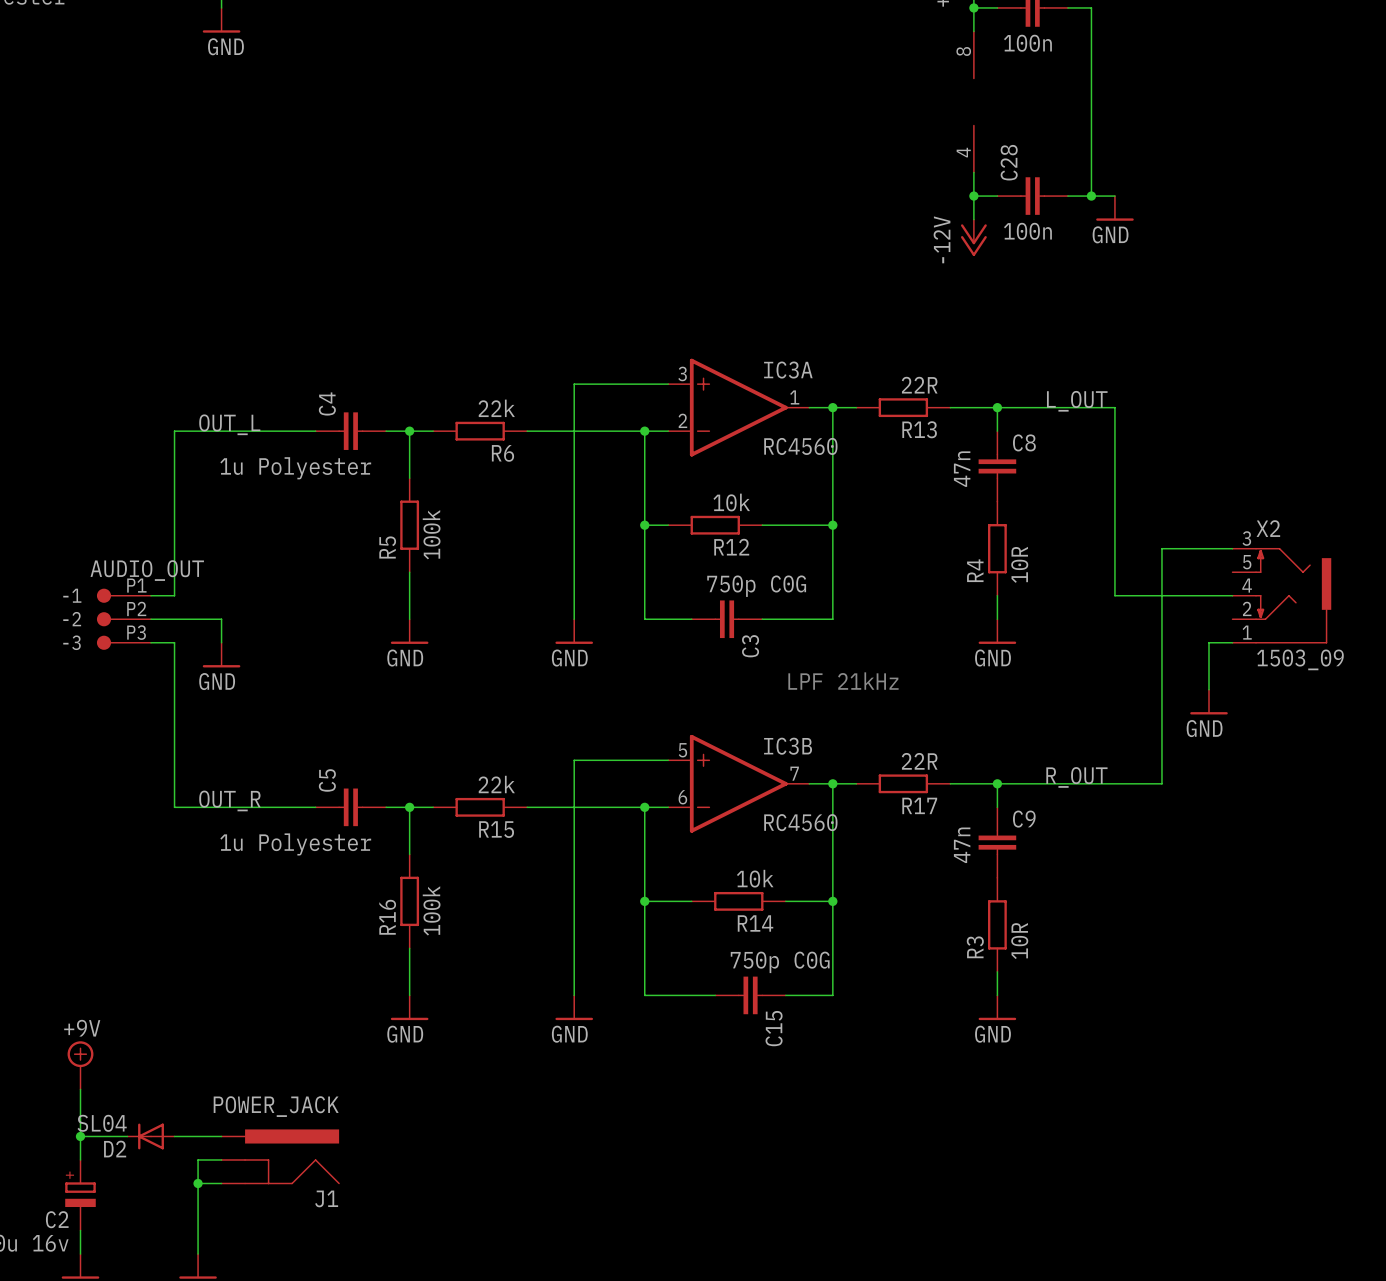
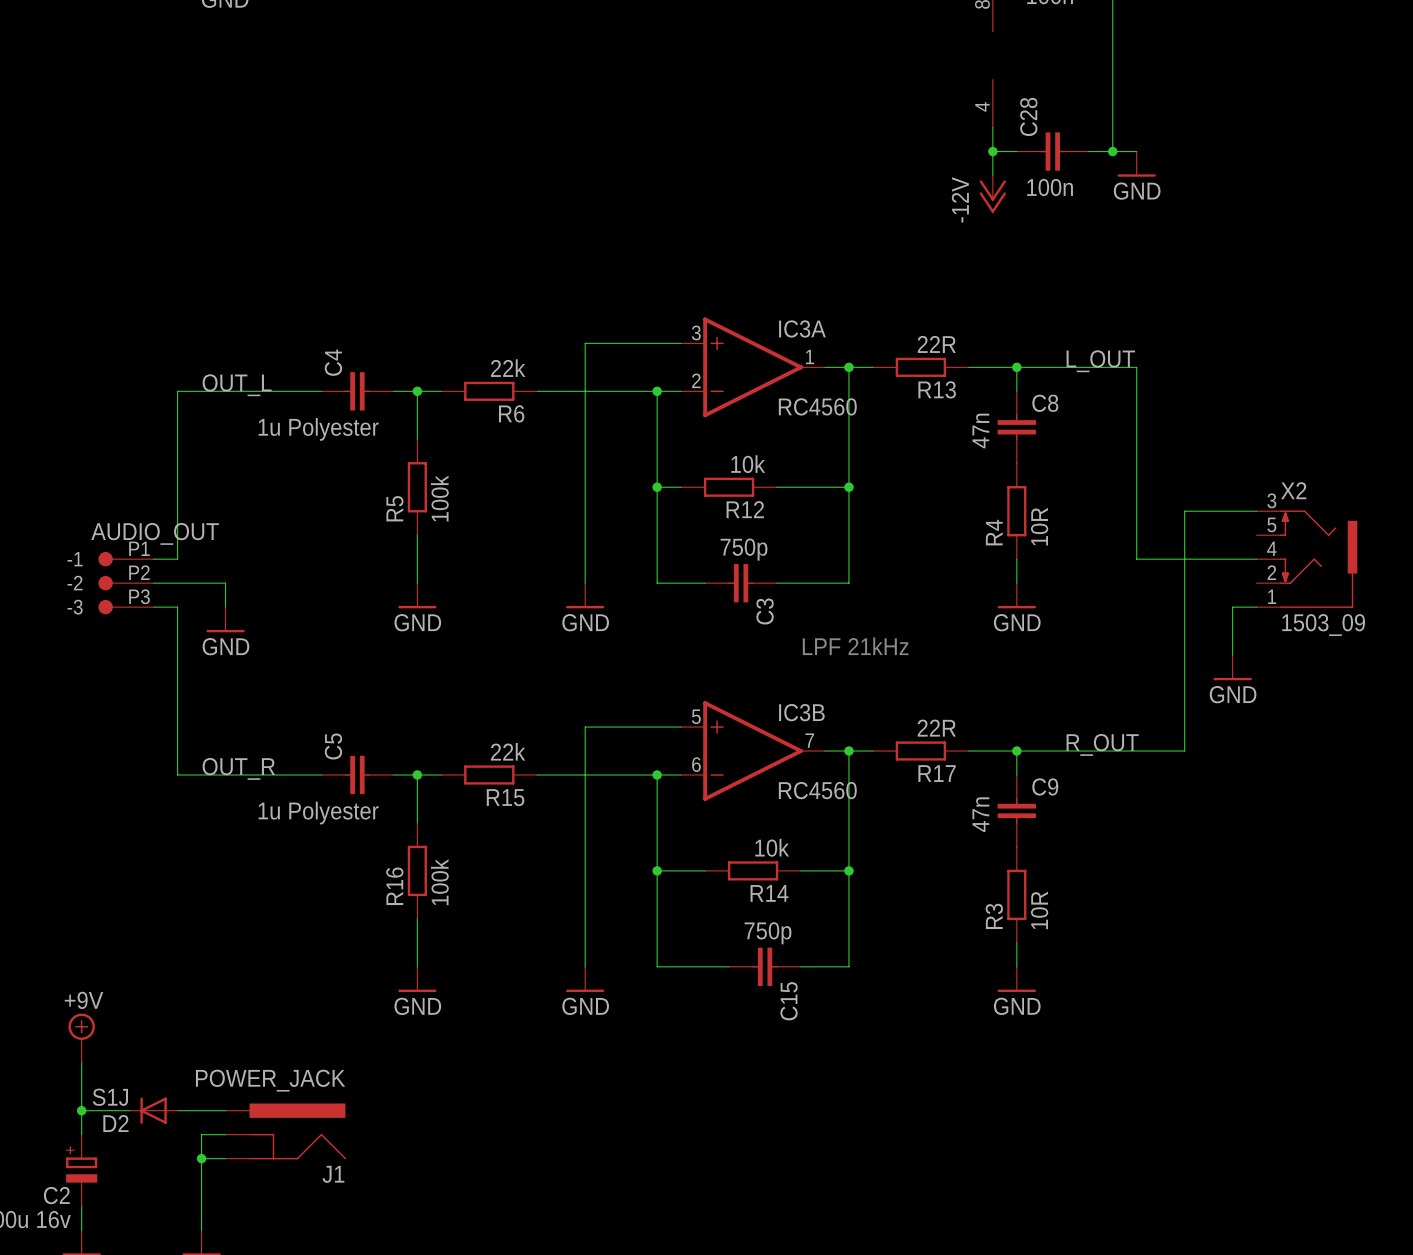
C3 value: 750p C0G (756, 586) -> 750p (744, 549)
C15 value: 750p C0G (780, 962) -> 750p (768, 933)
D2 value: SL04 (102, 1123) -> S1J (110, 1097)

